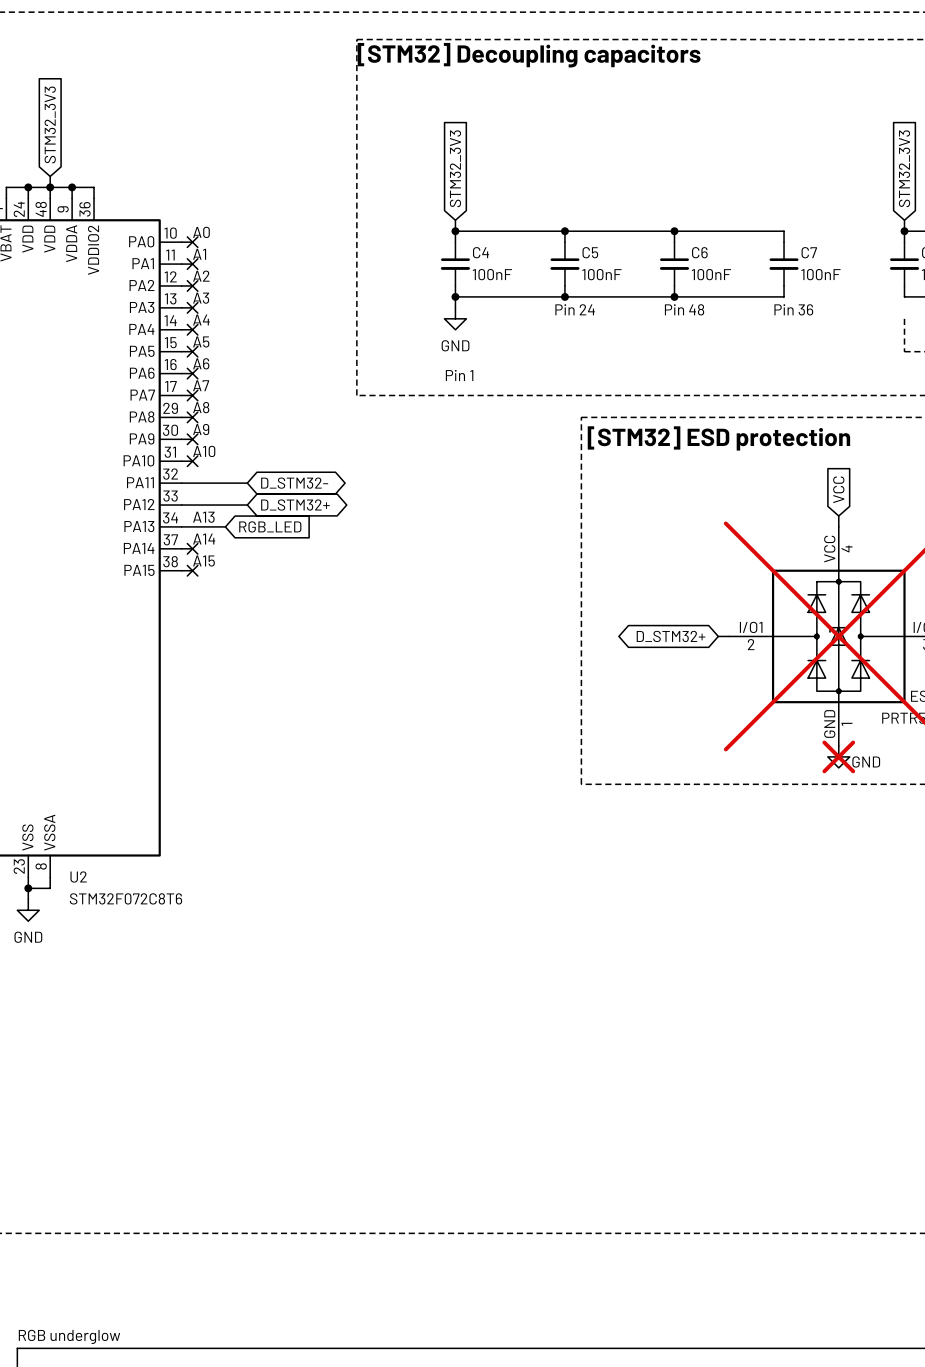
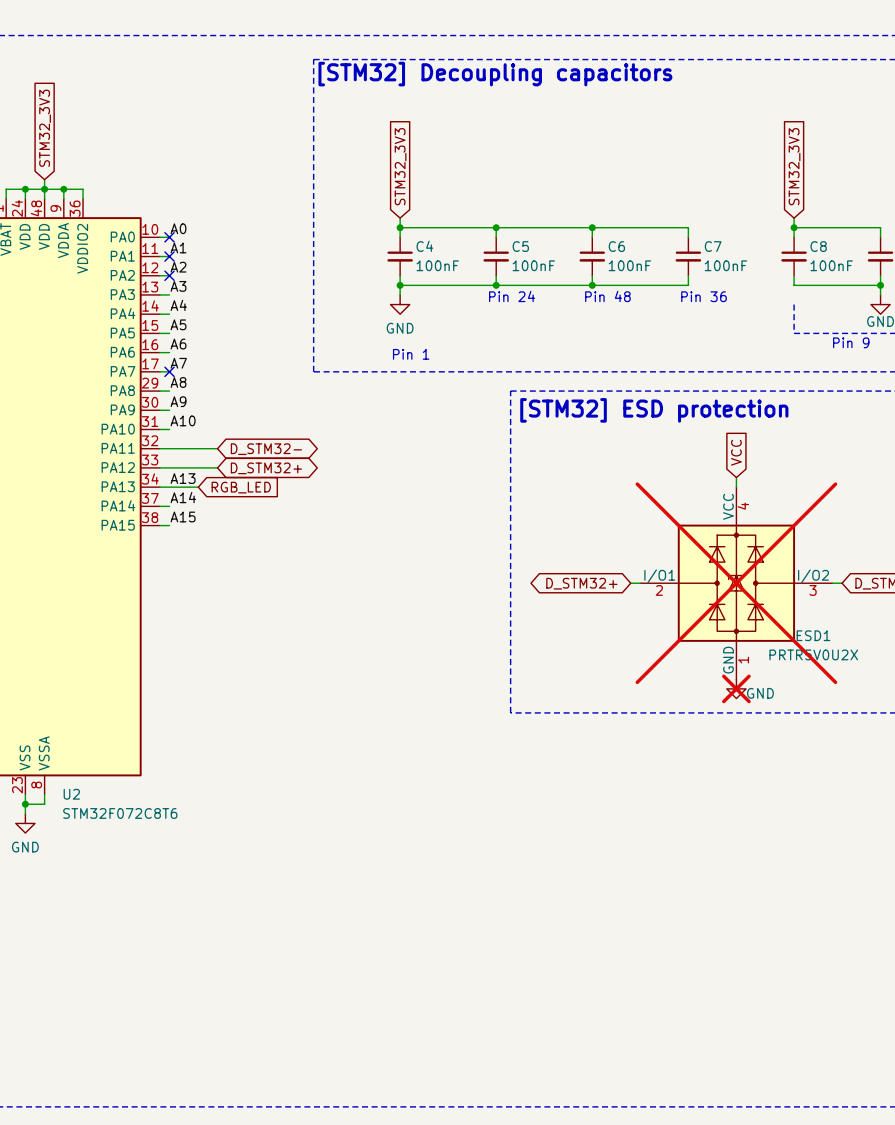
no-connect mark: (192, 307) -> none
no-connect mark: (192, 329) -> none
no-connect mark: (192, 351) -> none
no-connect mark: (192, 373) -> none
no-connect mark: (192, 417) -> none
no-connect mark: (192, 439) -> none
no-connect mark: (192, 461) -> none
no-connect mark: (192, 548) -> none
no-connect mark: (192, 570) -> none

